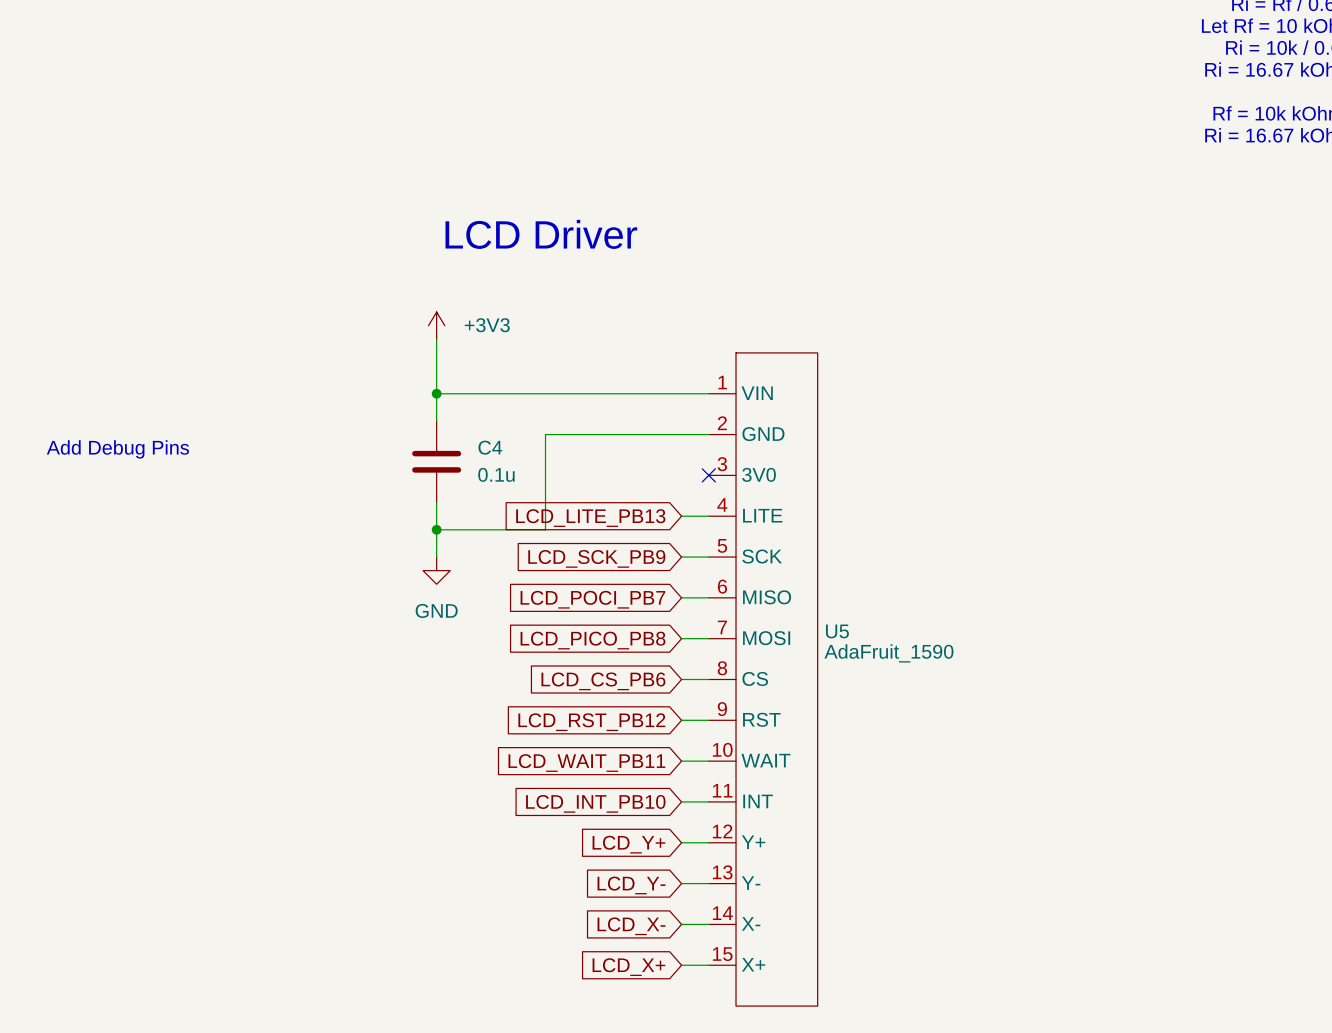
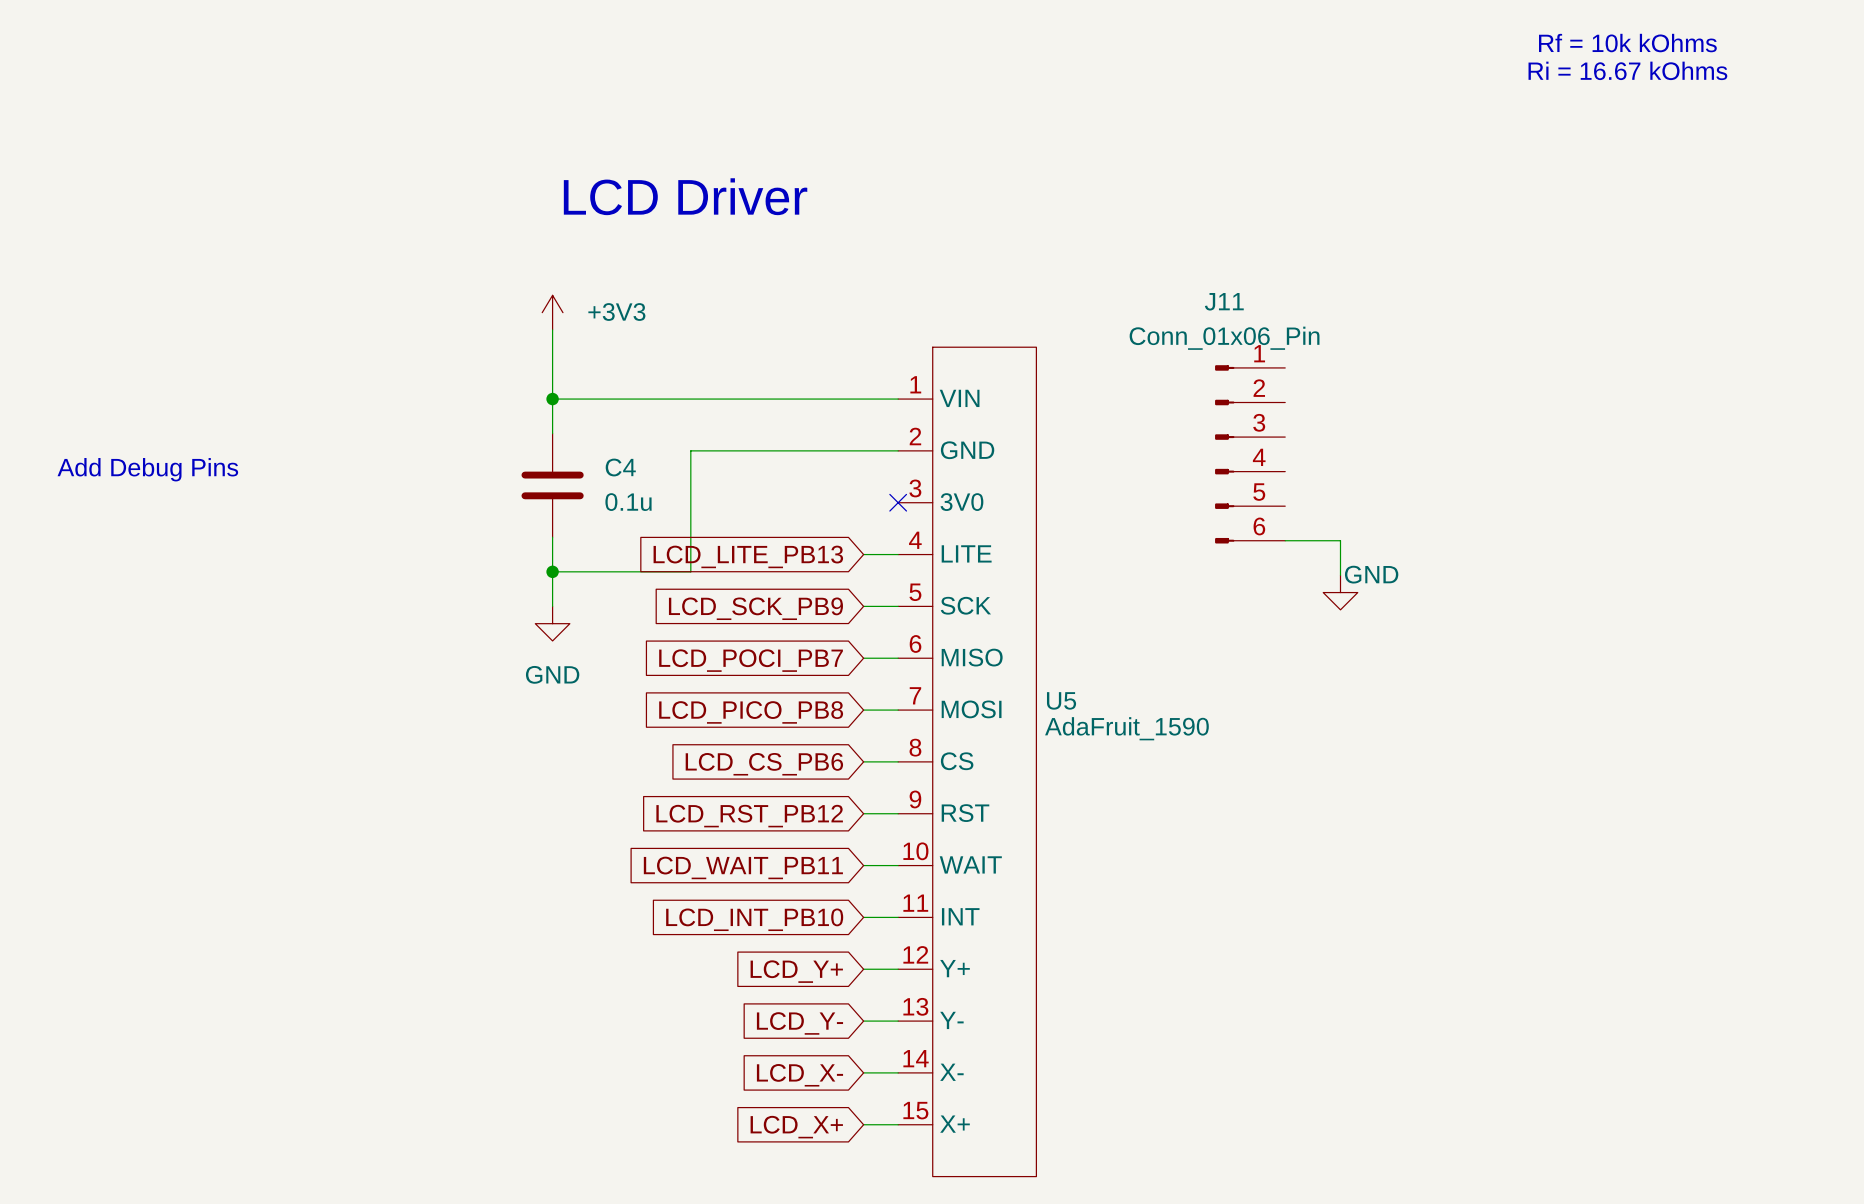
J11: none -> Conn_01x06_Pin (1250, 454)
wire: none -> (1285, 540) (1340, 540) (1340, 575)
power symbol: none -> GND (1340, 592)

